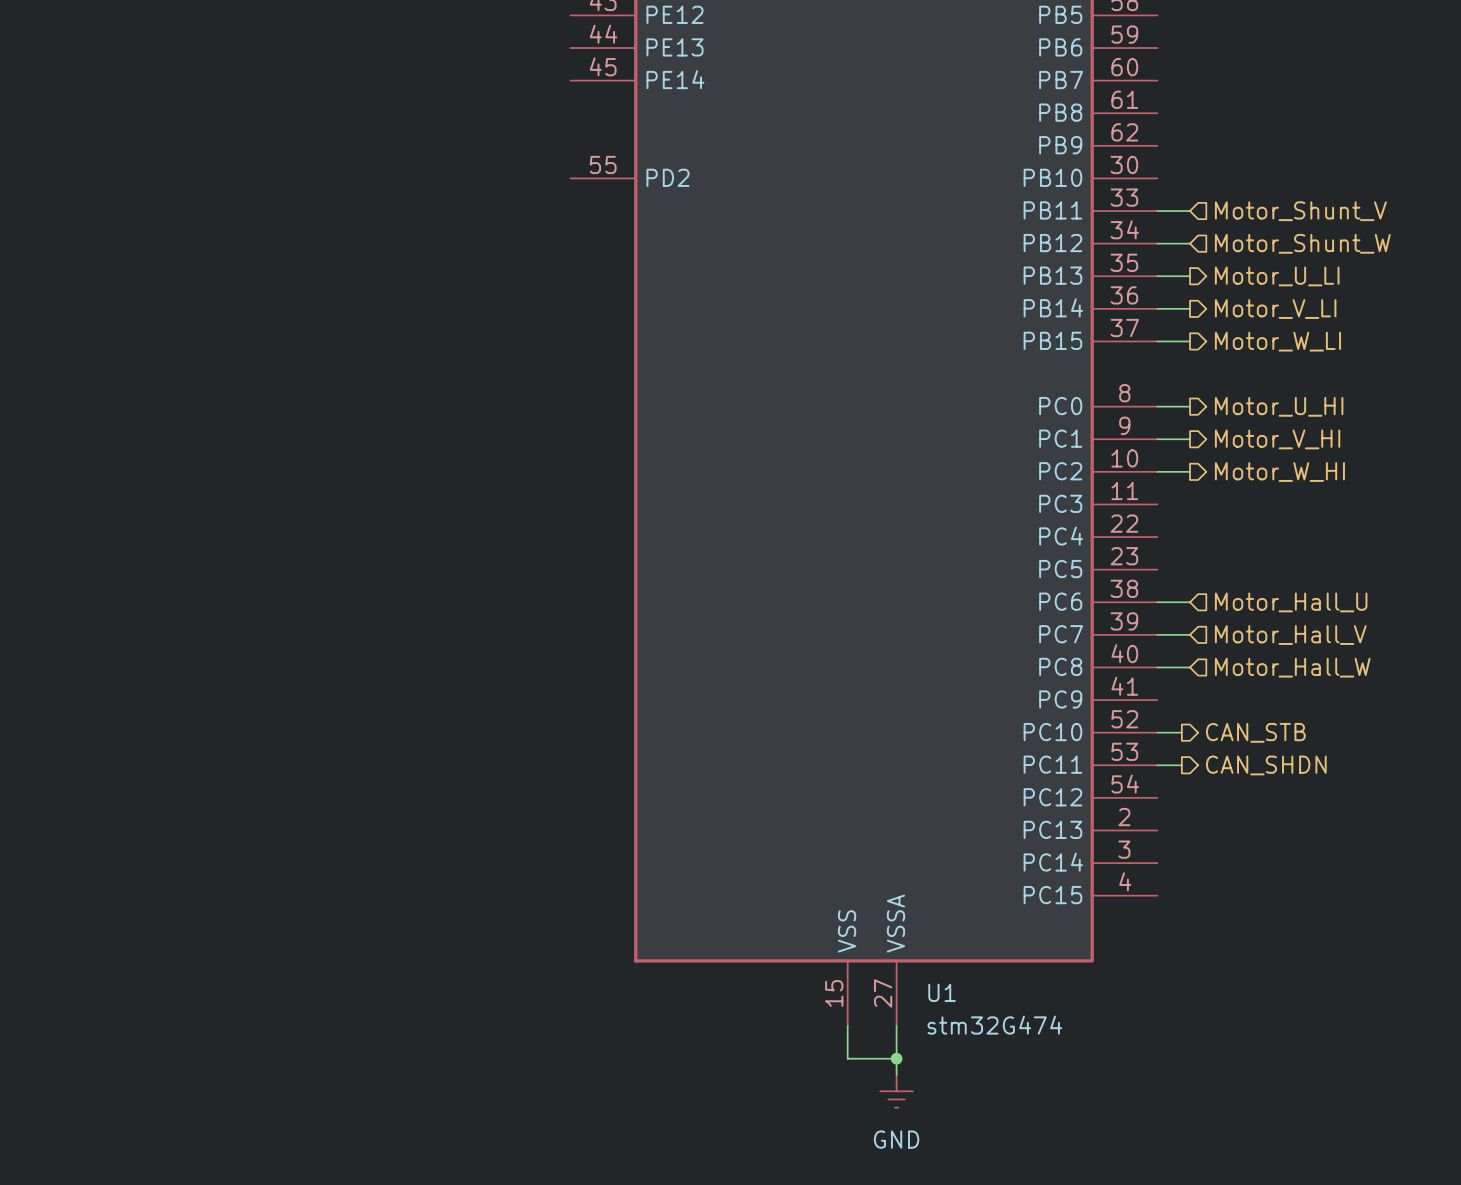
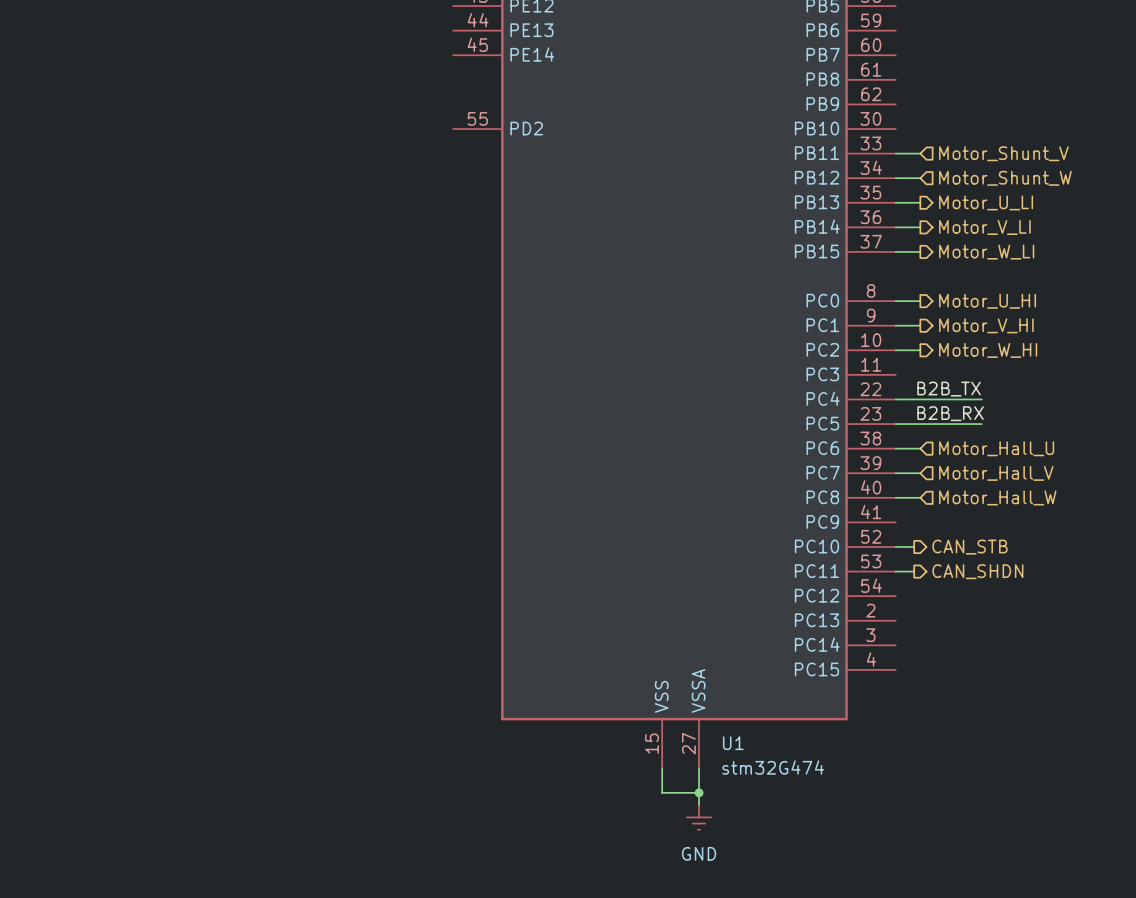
label: none -> B2B_TX (949, 389)
wire: none -> (895, 399) (981, 399)
label: none -> B2B_RX (950, 413)
wire: none -> (895, 424) (981, 424)

